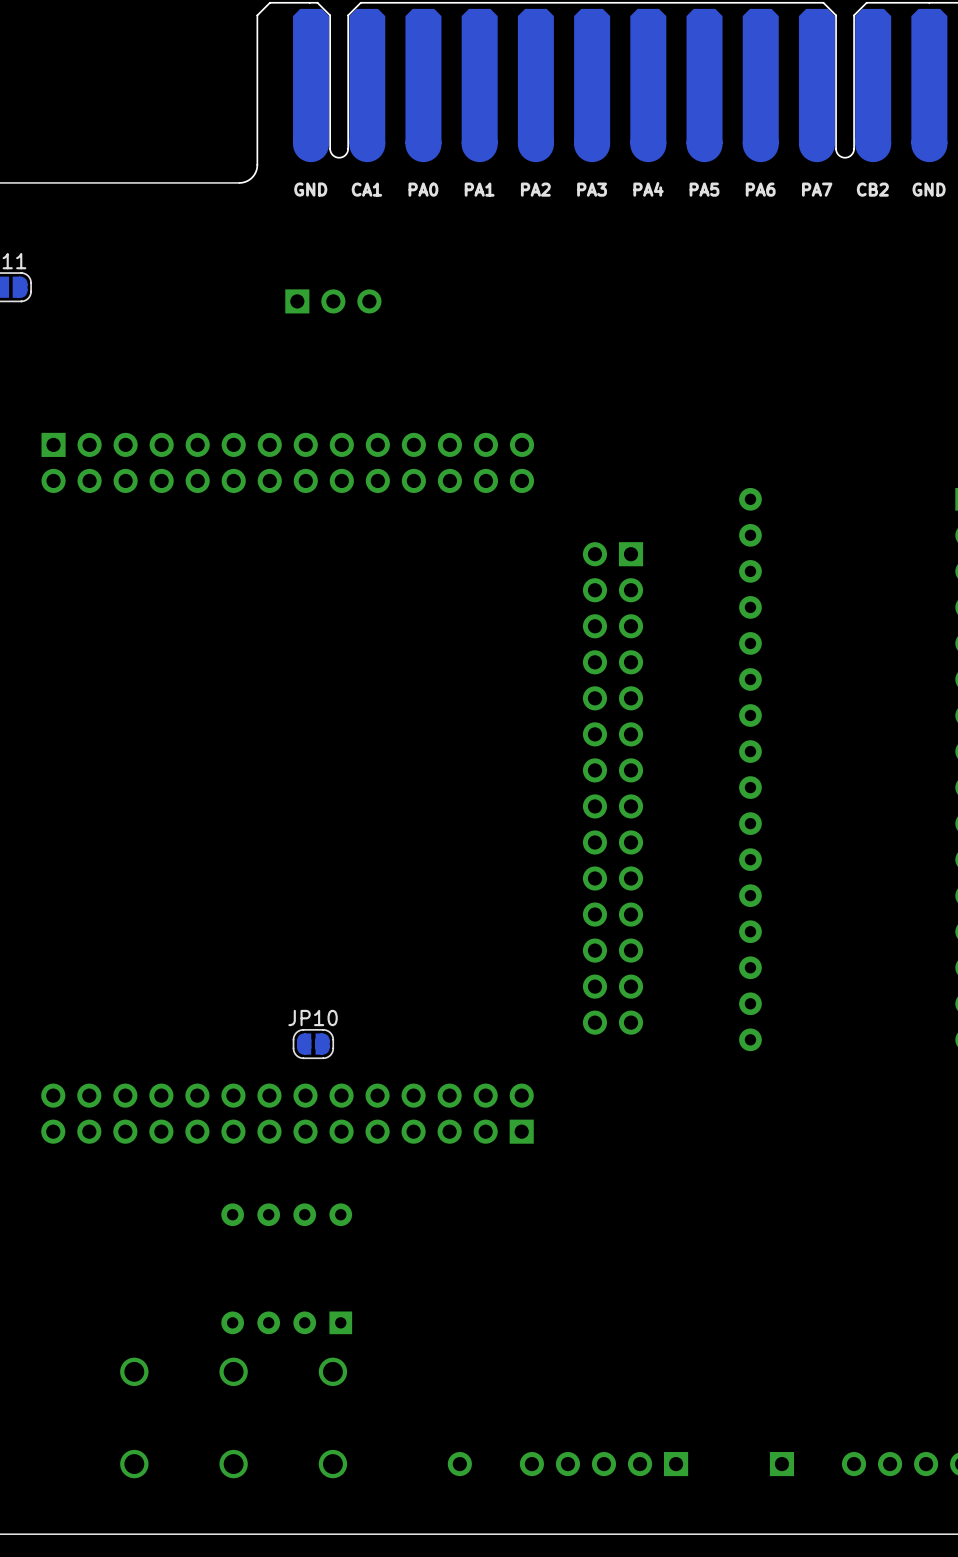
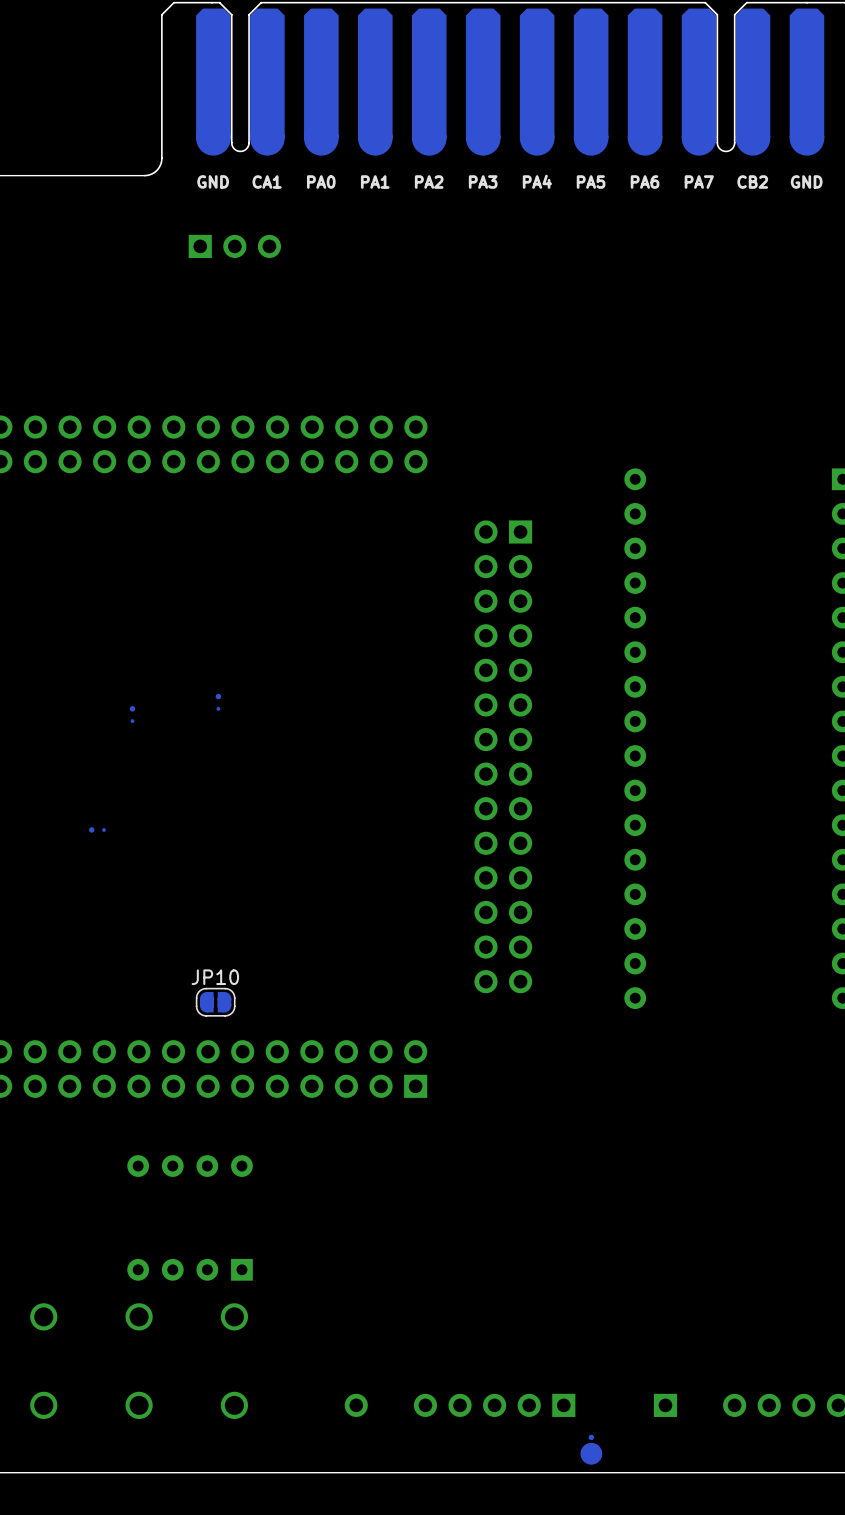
part position: (333, 301) -> (234, 246)
part: none -> (218, 702)
part: none -> (132, 714)
part: none -> (97, 829)
part: none -> (591, 1449)

